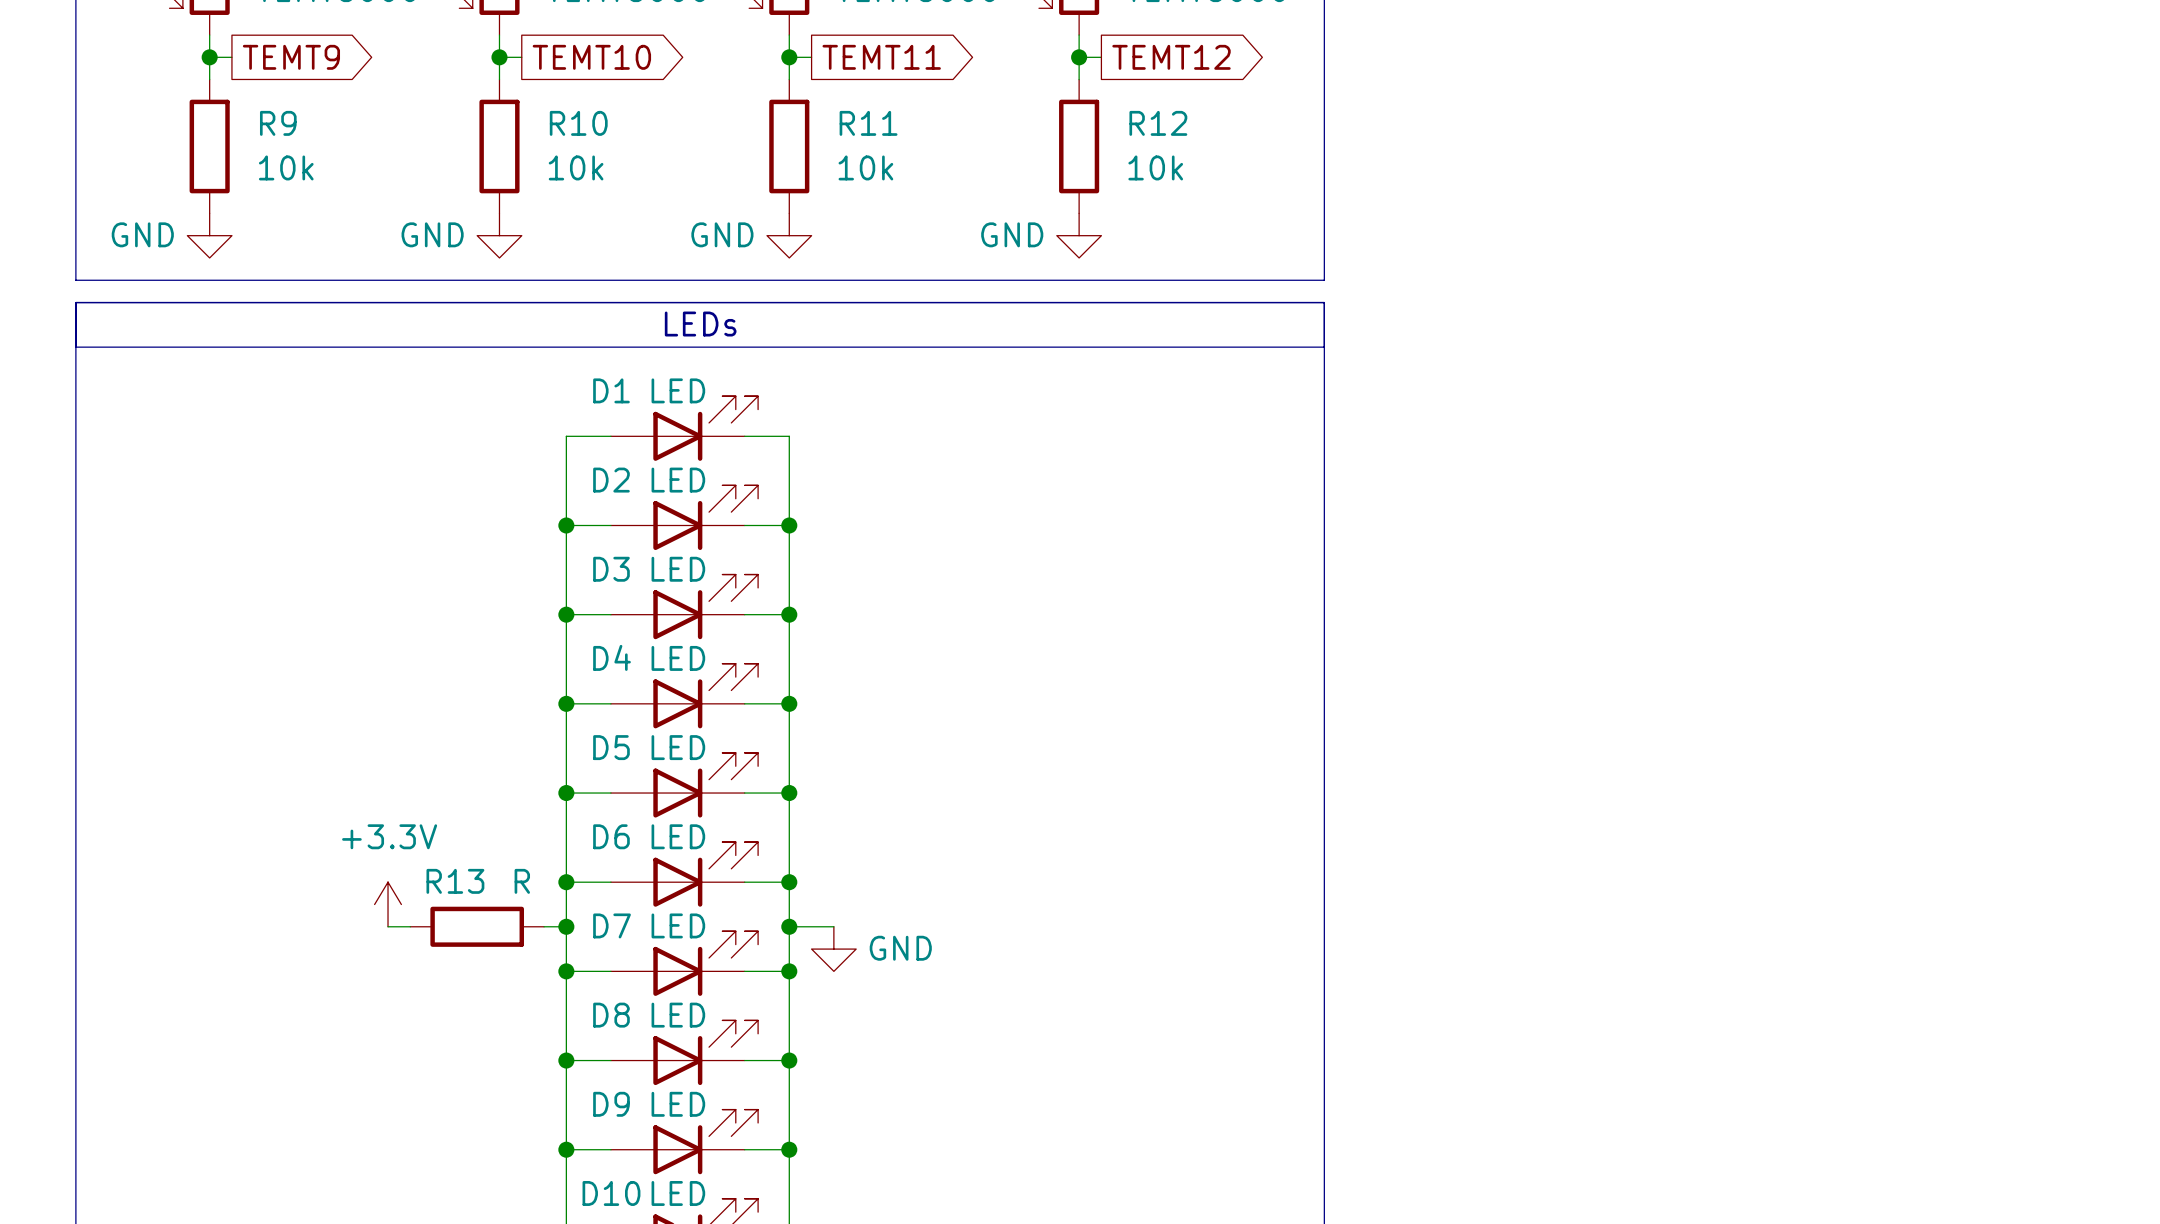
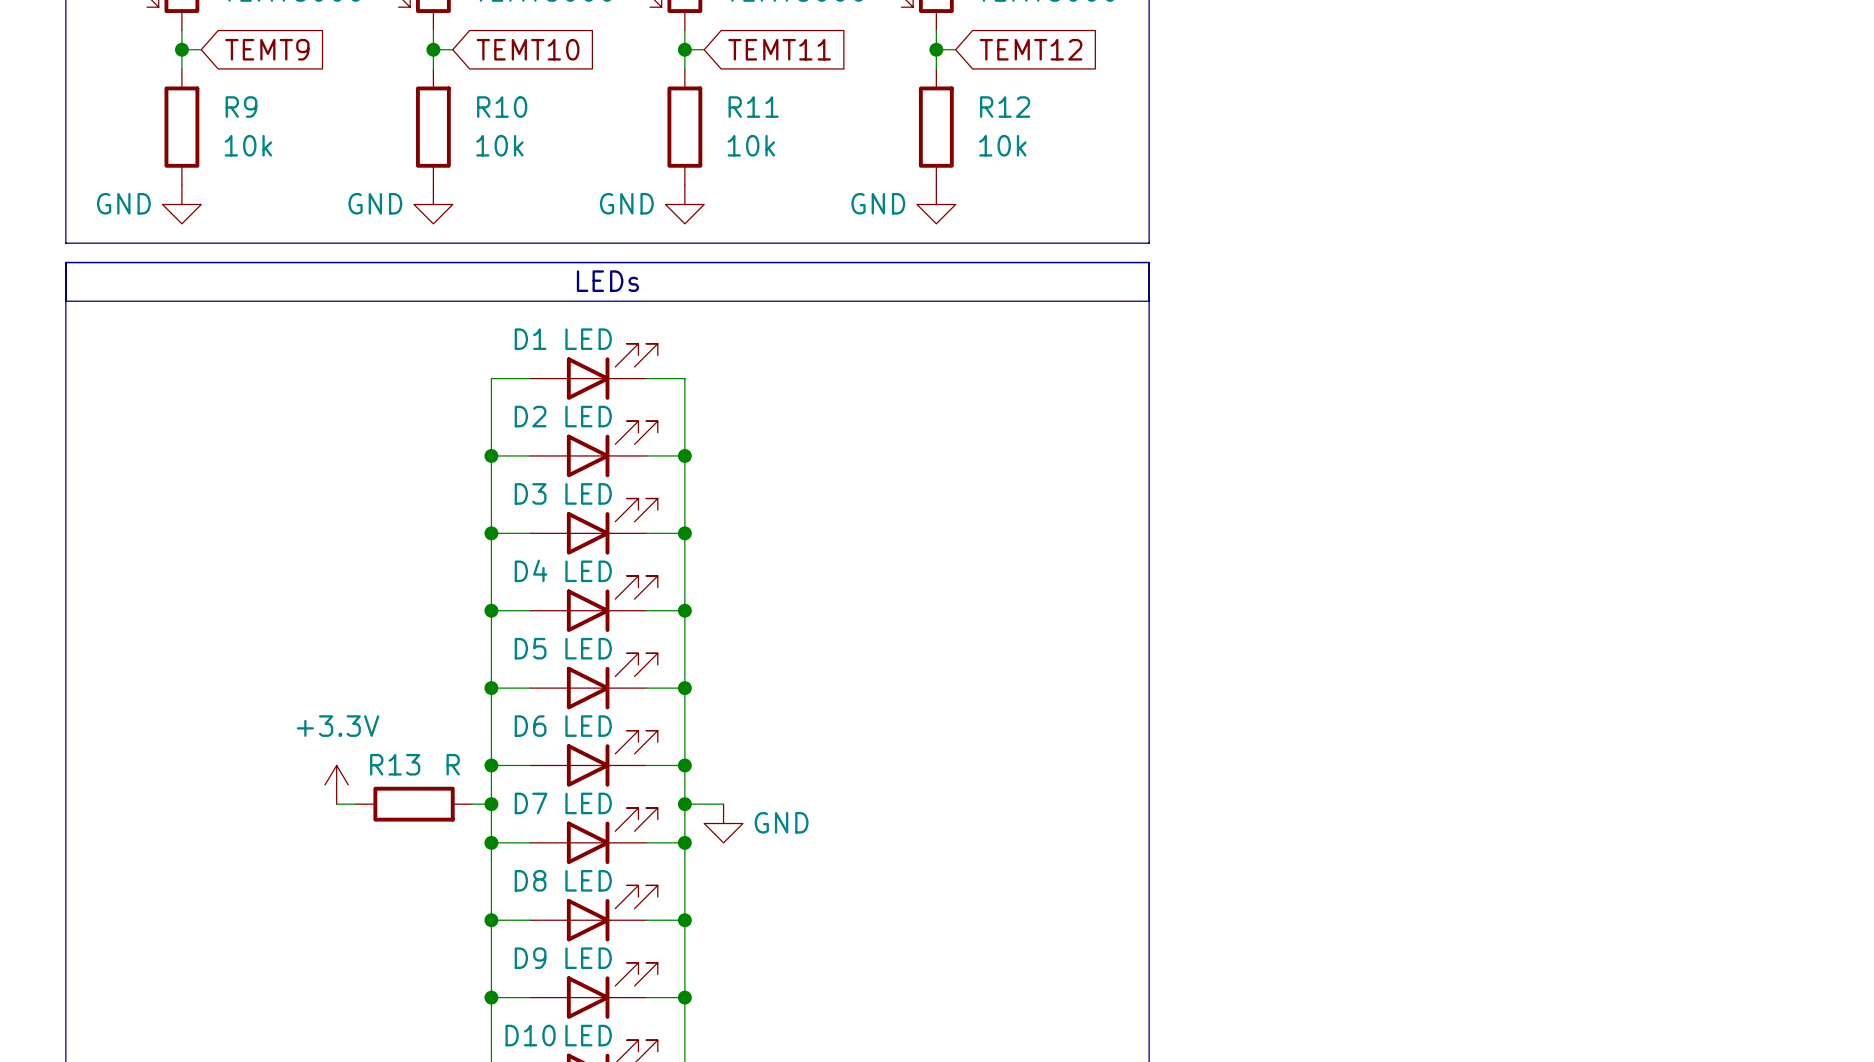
global label shape: output (291, 57) -> input (267, 49)
global label shape: output (591, 57) -> input (528, 49)
global label shape: output (881, 57) -> input (779, 49)
global label shape: output (1171, 57) -> input (1031, 49)

